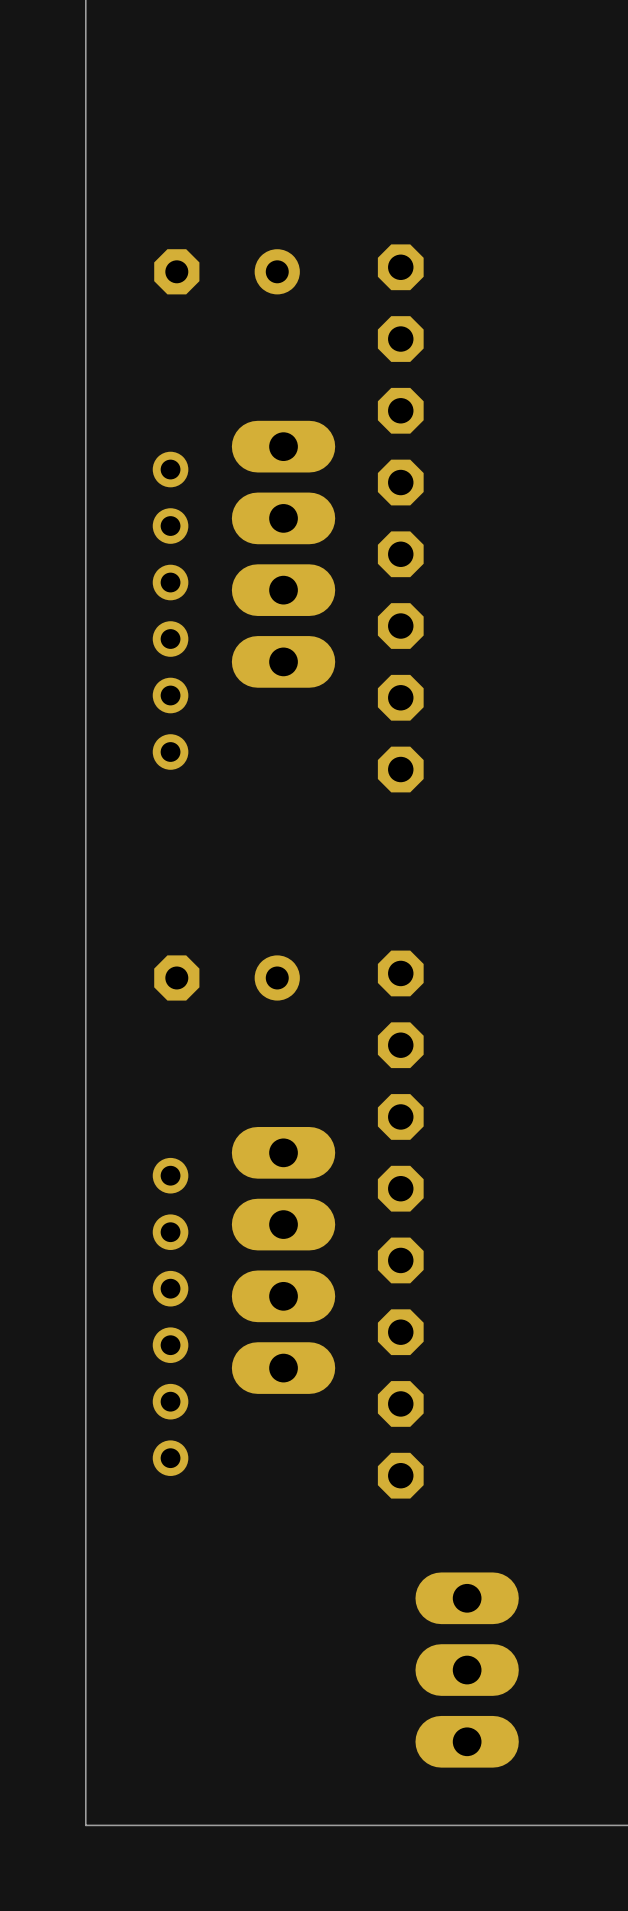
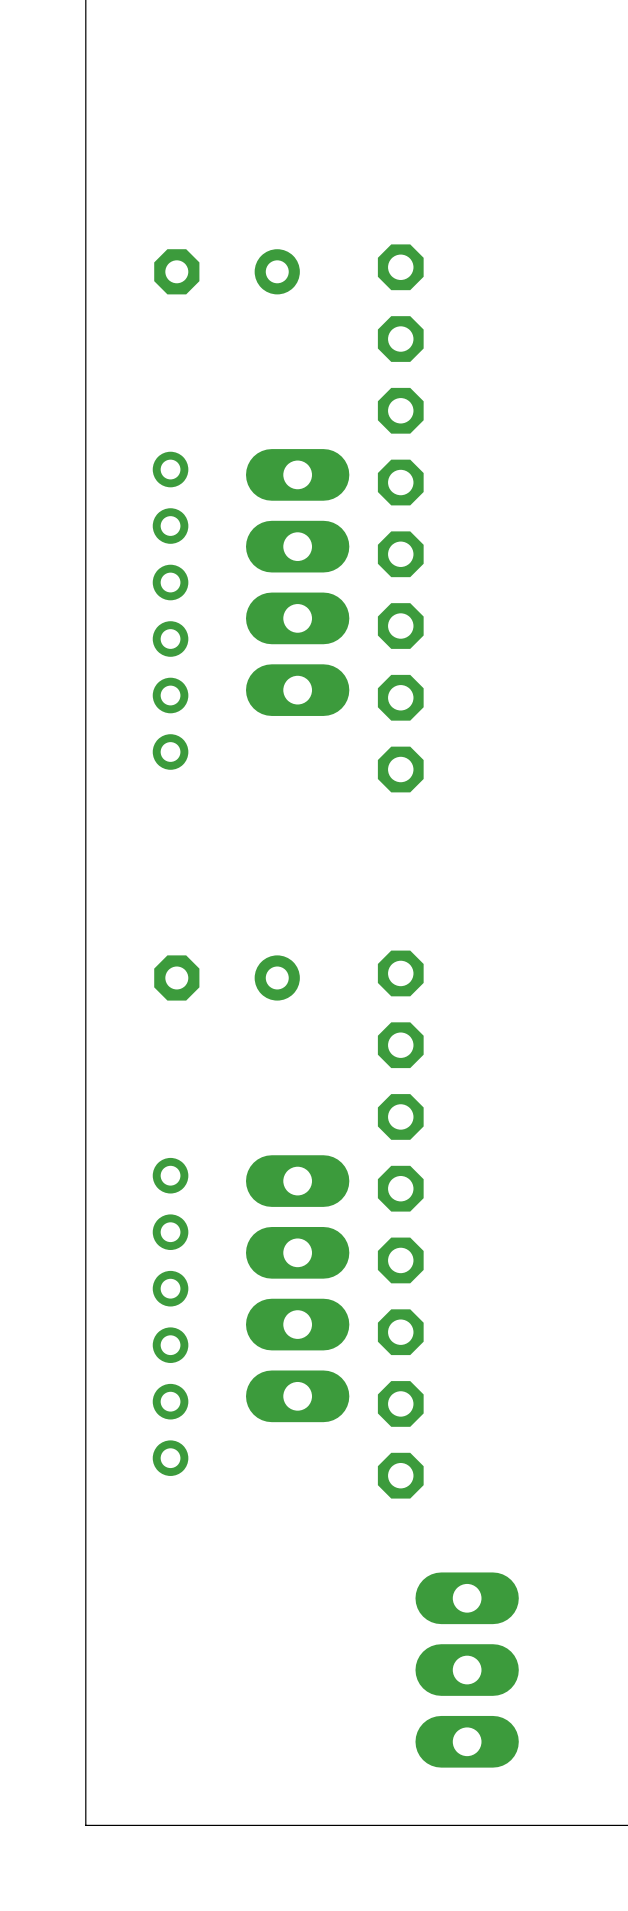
part position: (283, 554) -> (297, 582)
part position: (283, 1260) -> (297, 1288)

